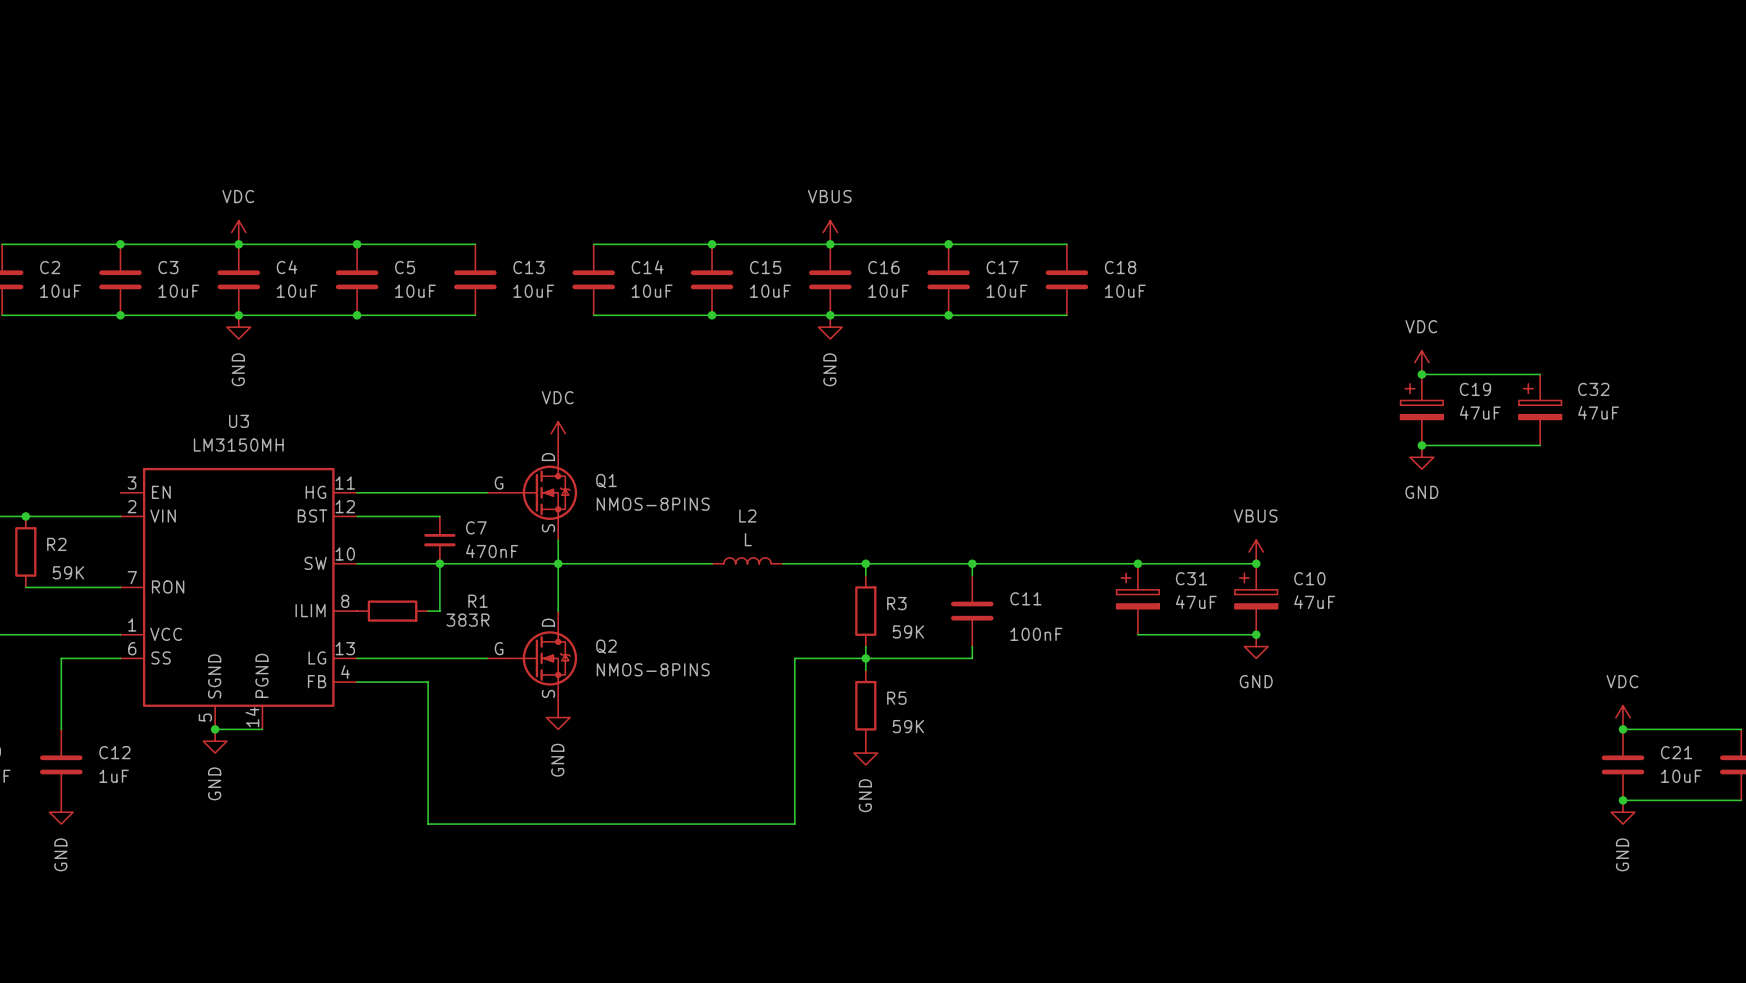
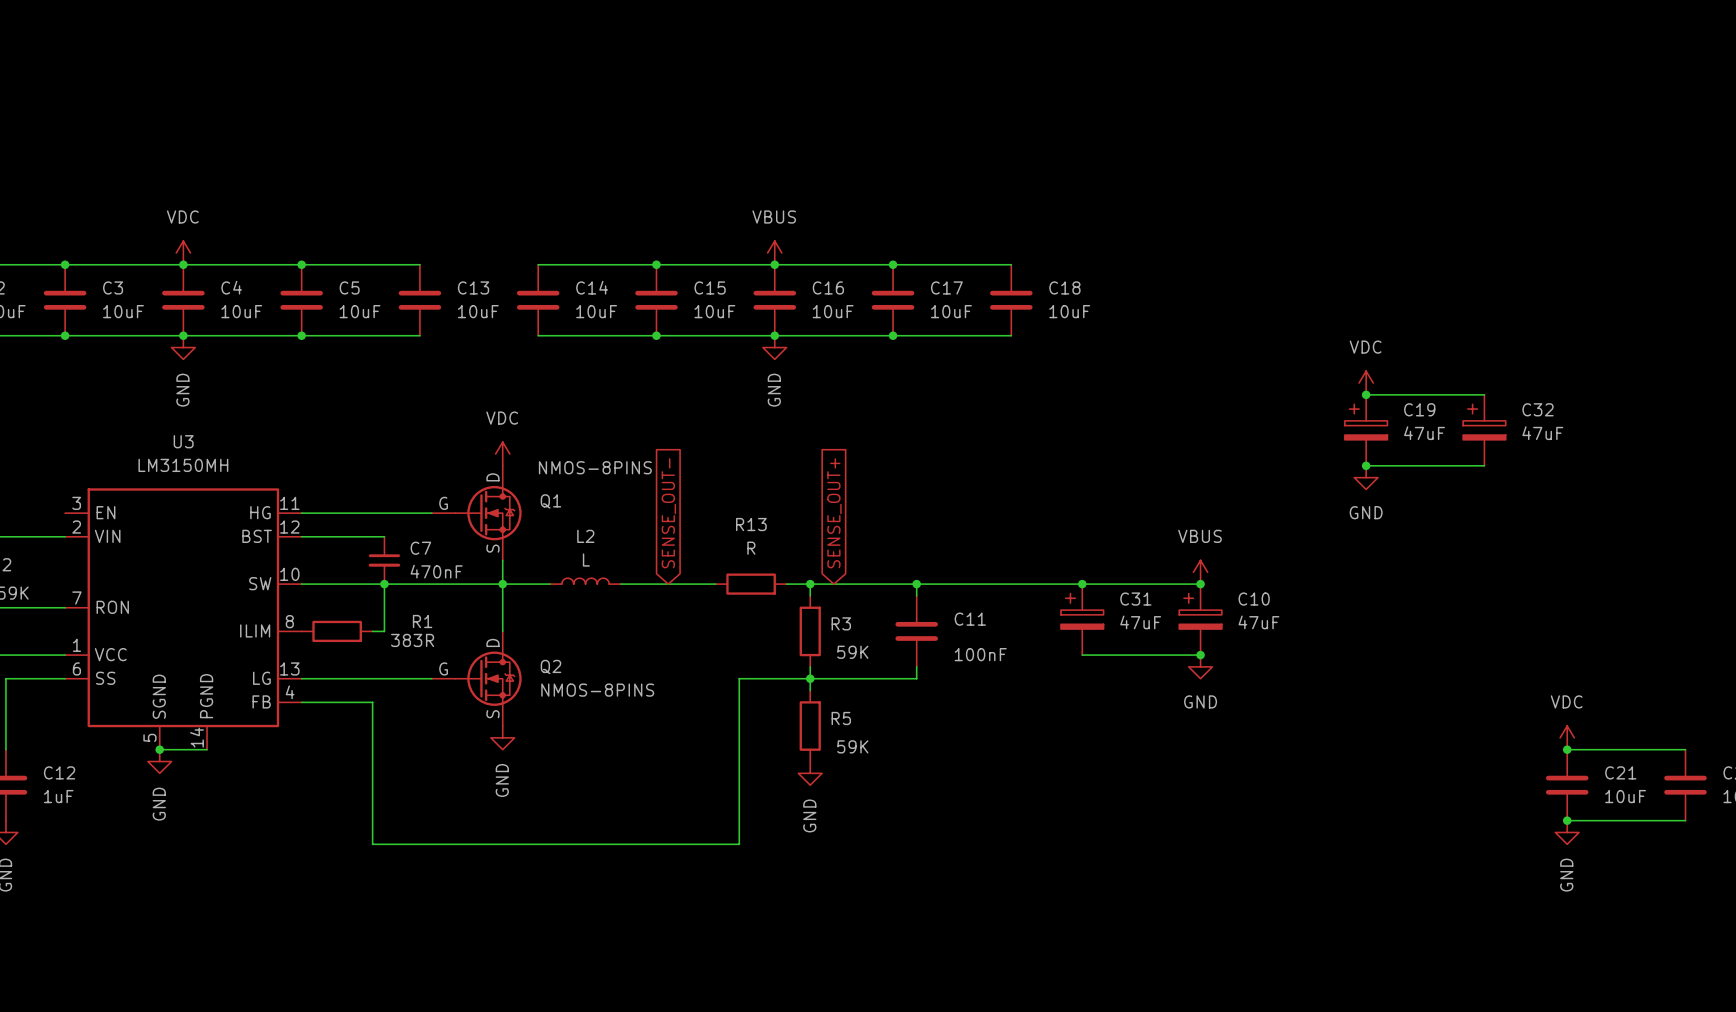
global label: none -> SENSE_OUT- (668, 513)
global label: none -> SENSE_OUT+ (834, 513)
Q1 value position: NMOS-8PINS (653, 504) -> NMOS-8PINS (595, 467)
L2 position: (747, 560) -> (585, 581)
wire: (605, 563) (676, 563) -> none
wire: (783, 563) (842, 563) -> (656, 584) (715, 584)
R13: none -> R (751, 584)

